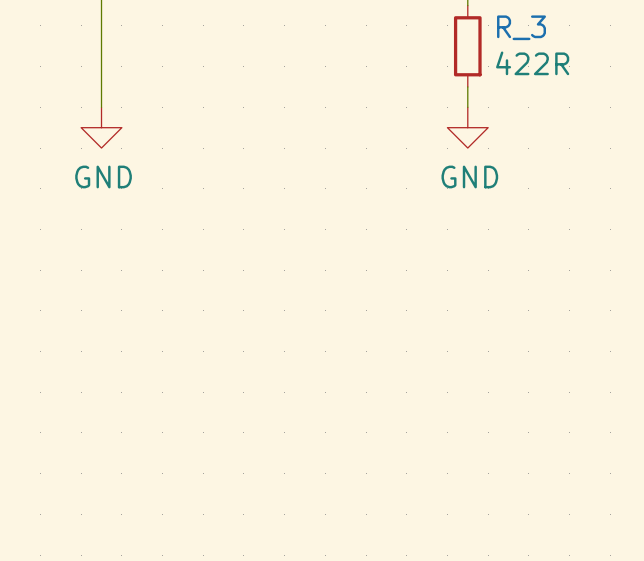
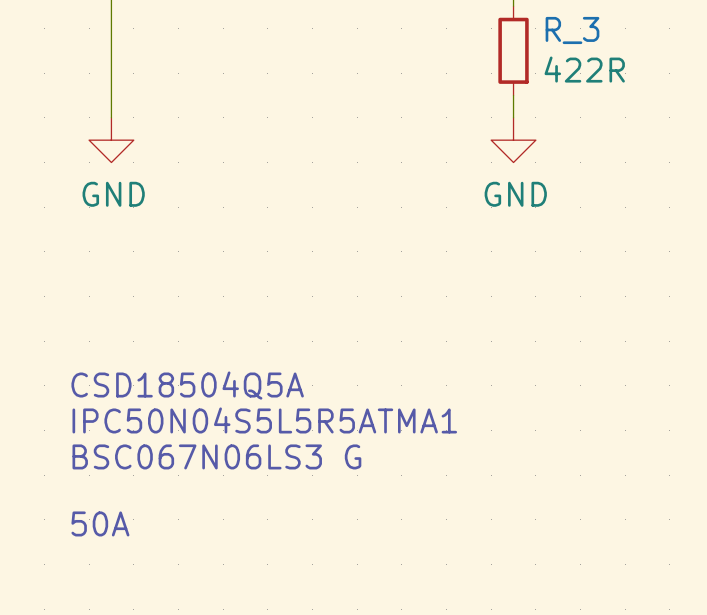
text: none -> CSD18504Q5A (187, 385)
text: none -> IPC50N04S5L5R5ATMA1 (264, 420)
text: none -> BSC067N06LS3 G (216, 456)
text: none -> 50A (100, 523)

